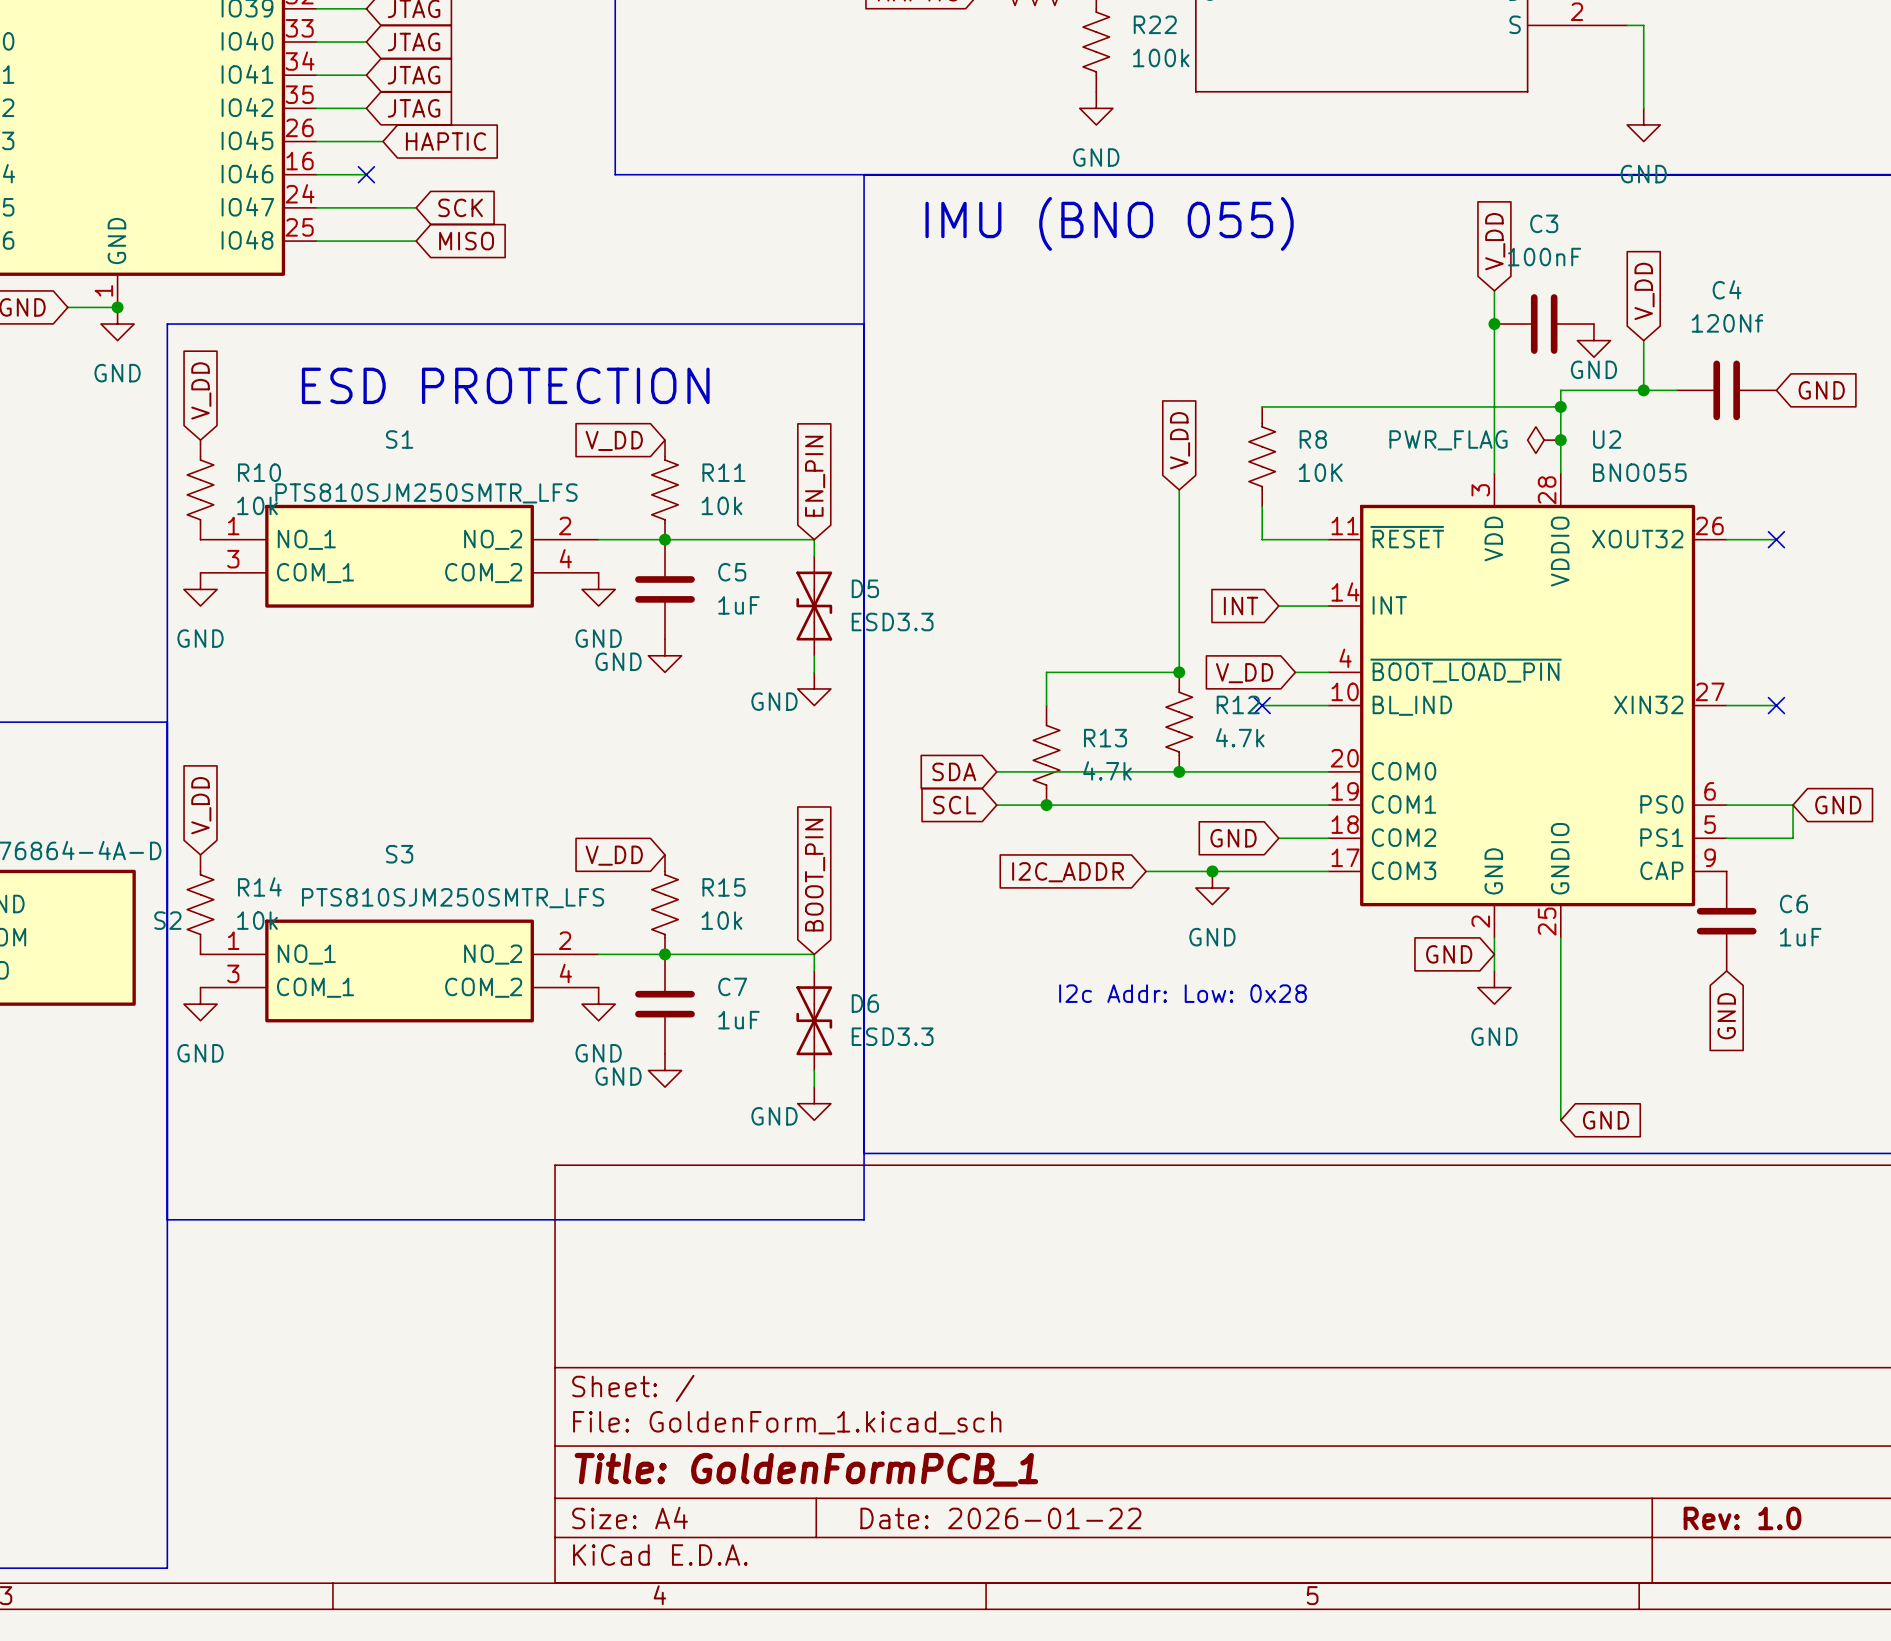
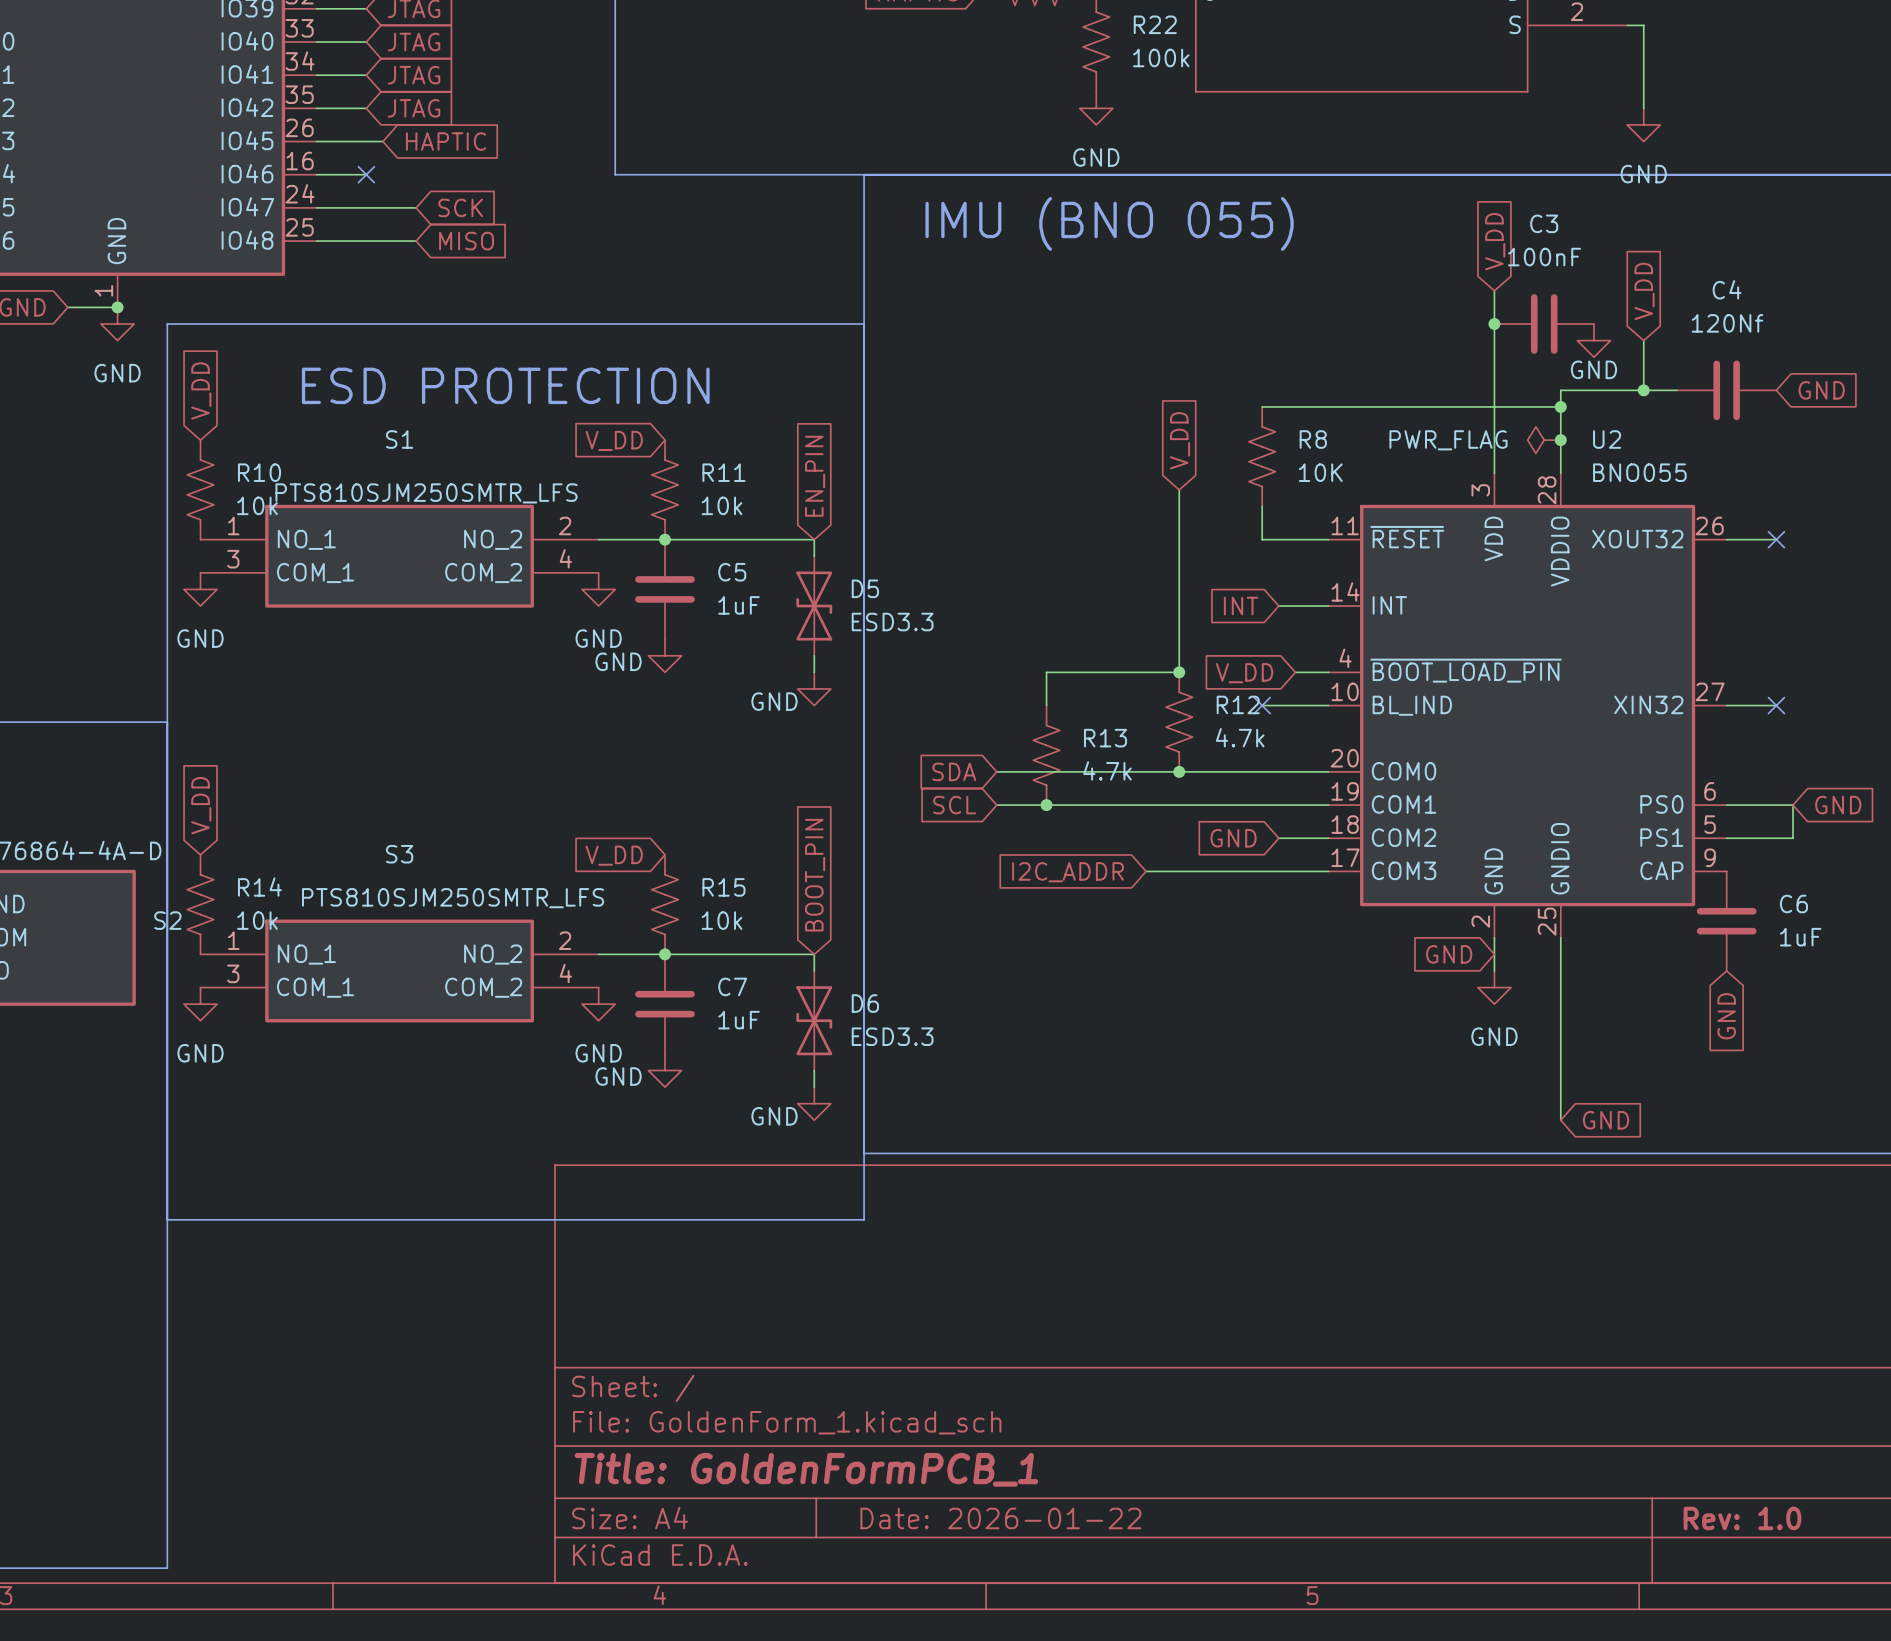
junction: (1212, 871) -> none
power symbol: GND (1212, 888) -> none
text: I2c Addr: Low: 0x28 (1182, 993) -> none

